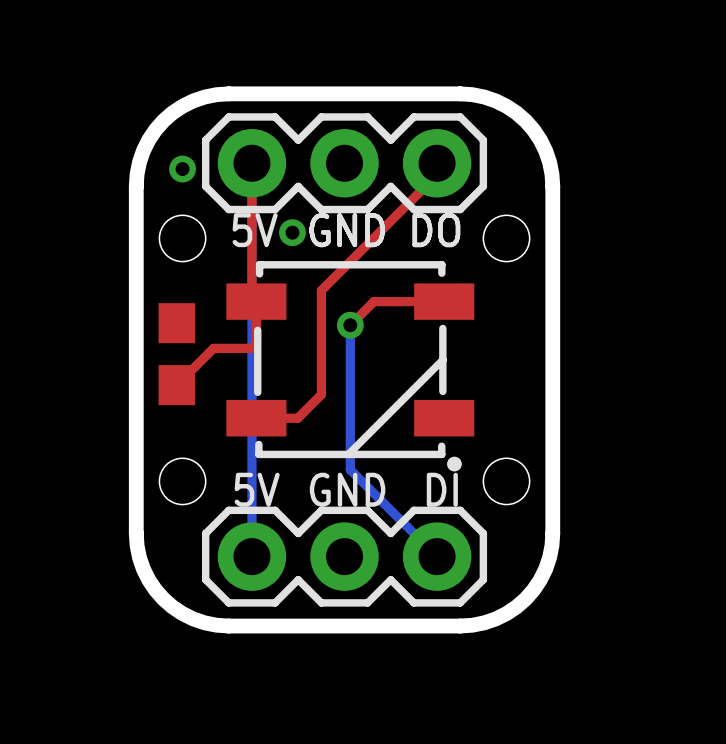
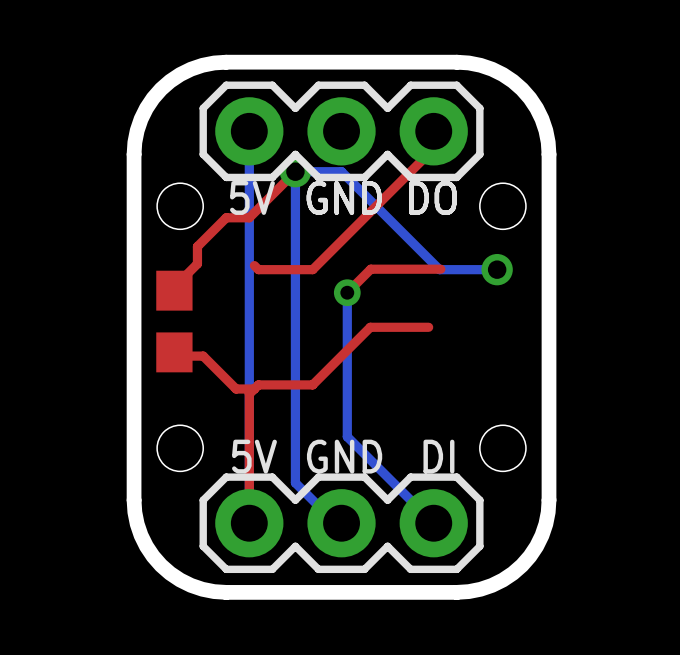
top track: (251, 163) (251, 303) (256, 307) -> none
via: (182, 169) -> none
top track: (437, 174) (321, 290) (321, 394) (297, 418) (256, 418) -> (433, 142) (433, 148) (312, 269) (258, 269) (254, 265)
top track: none -> (295, 171) (249, 217) (226, 217) (197, 246) (197, 263) (174, 286) (174, 290)
via position: (292, 232) -> (295, 171)
top track: (256, 301) (256, 343) (251, 348) (213, 348) (176, 385) (178, 386) (182, 383) -> none
bottom track: none -> (497, 269) (439, 269) (341, 171) (295, 171) (295, 482) (335, 523) (341, 523)
via: none -> (497, 269)
top track: none -> (428, 327) (370, 327) (312, 384) (258, 384) (249, 394) (249, 523)
part: (350, 366) -> none
top track: none -> (178, 356) (203, 356) (236, 389) (254, 389)

